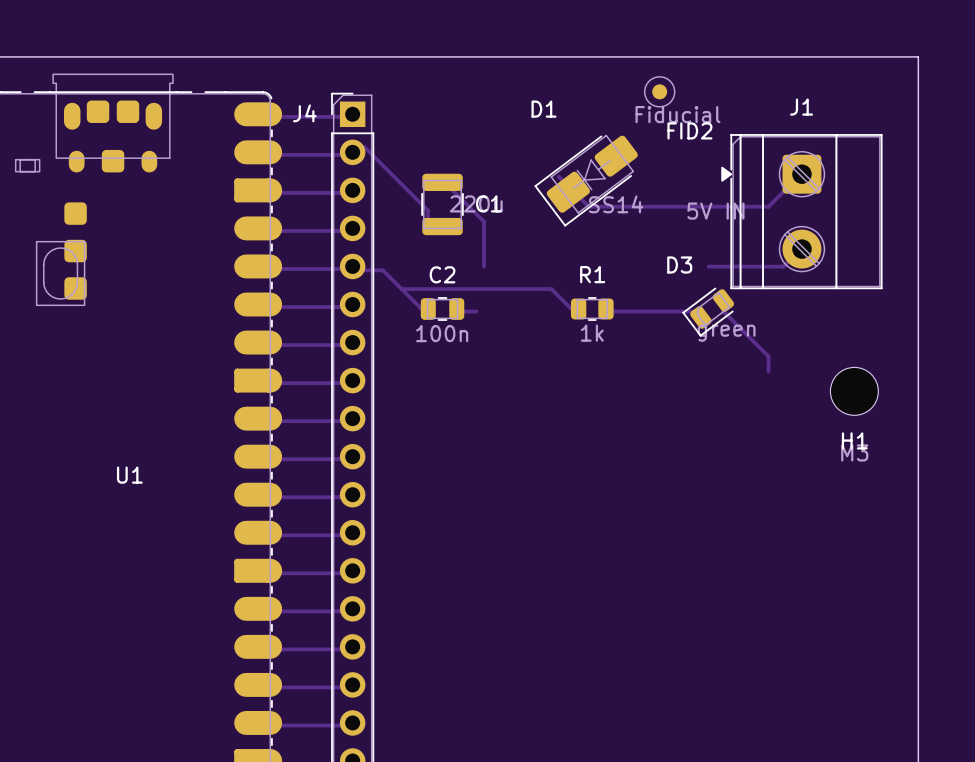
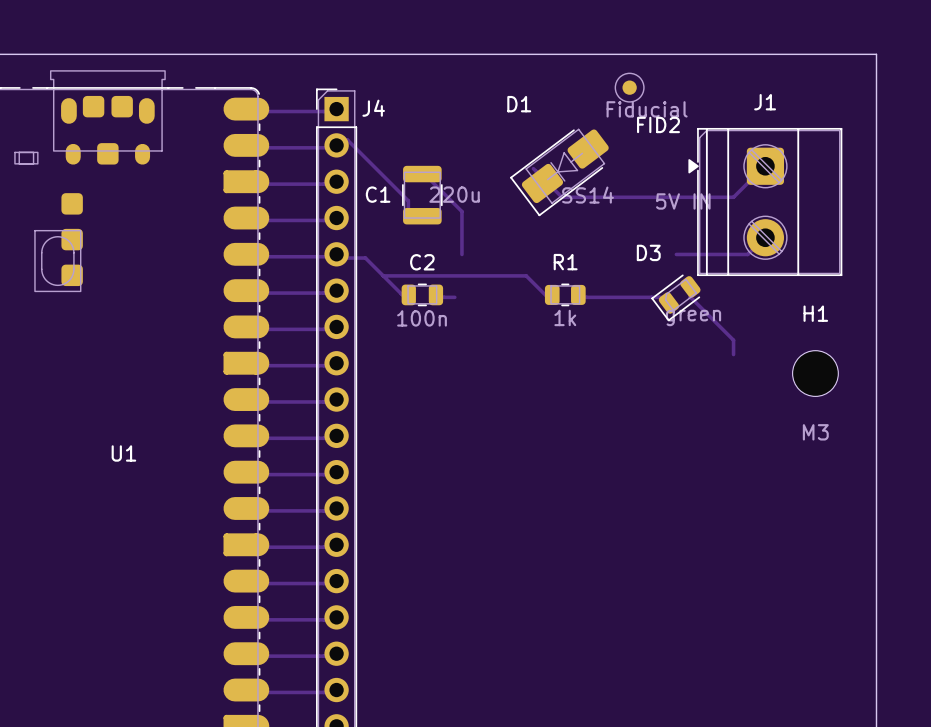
J4 name position: J4 (304, 113) -> J4 (373, 108)
C1 name position: C1 (488, 203) -> C1 (378, 194)
H1 name position: H1 (854, 440) -> H1 (815, 313)

